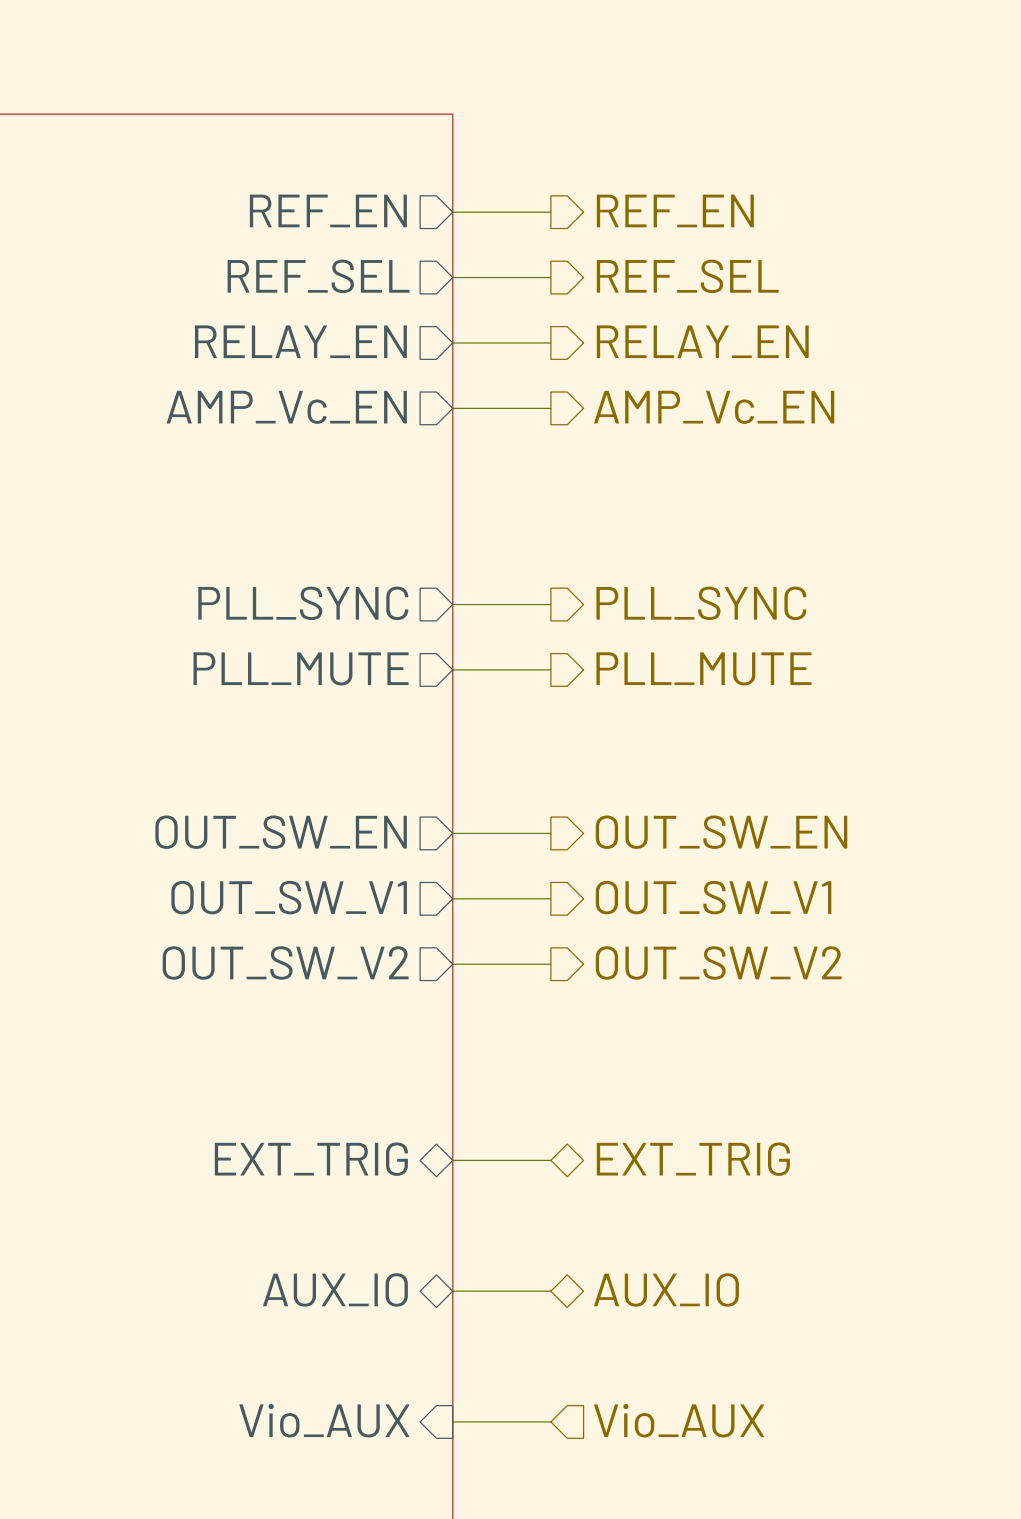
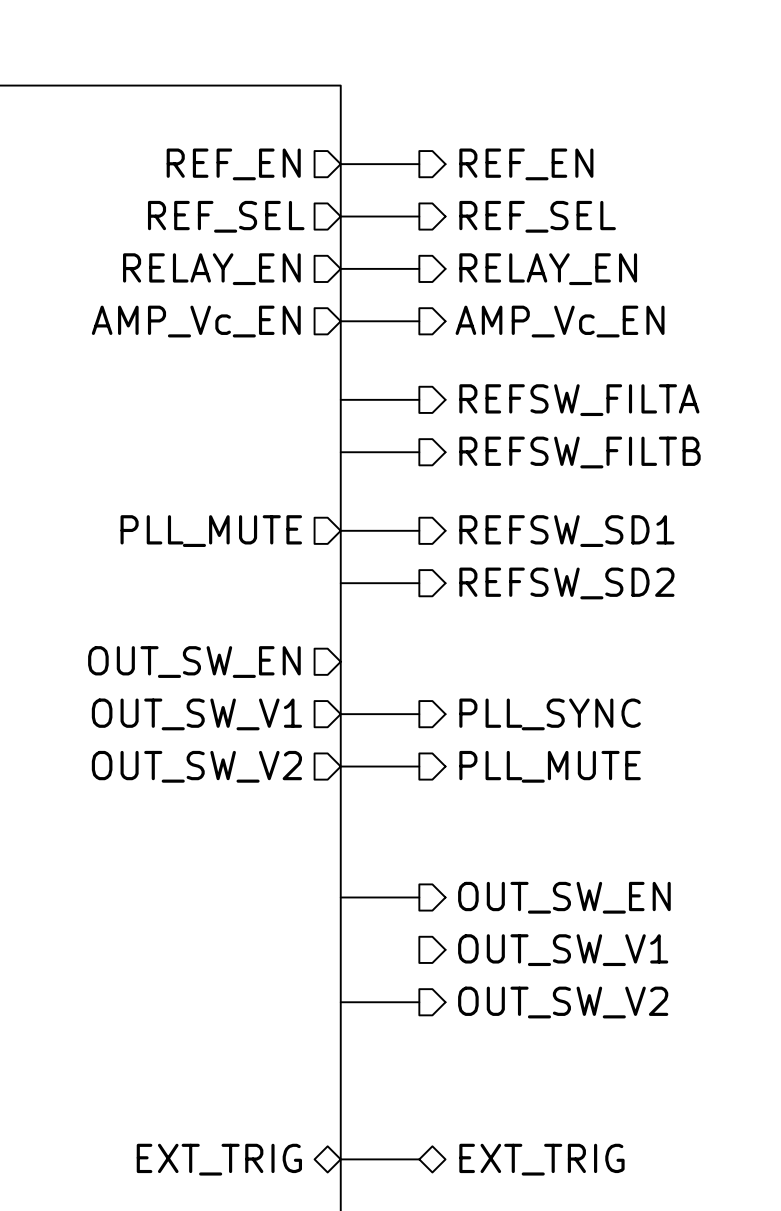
hierarchical label: none -> REFSW_FILTA (579, 400)
wire: none -> (340, 399) (419, 399)
hierarchical label: none -> REFSW_FILTB (580, 452)
sheet pin: PLL_SYNC (303, 603) -> none
hierarchical label: PLL_SYNC (701, 603) -> none
wire: (452, 604) (550, 604) -> (340, 452) (419, 452)
hierarchical label: PLL_MUTE (704, 668) -> REFSW_SD1 (566, 531)
hierarchical label: none -> REFSW_SD2 (566, 583)
hierarchical label position: OUT_SW_EN (721, 832) -> OUT_SW_EN (564, 897)
wire: (452, 833) (550, 833) -> (340, 583) (419, 583)
hierarchical label: OUT_SW_V1 (713, 897) -> PLL_SYNC (550, 714)
hierarchical label: OUT_SW_V2 (718, 962) -> PLL_MUTE (550, 766)
sheet pin position: EXT_TRIG (311, 1159) -> EXT_TRIG (219, 1159)
hierarchical label position: EXT_TRIG (693, 1159) -> EXT_TRIG (541, 1159)
wire: (452, 1160) (550, 1160) -> (340, 897) (419, 897)
hierarchical label: none -> OUT_SW_V1 (563, 950)
hierarchical label: none -> OUT_SW_V2 (563, 1002)
sheet pin: AUX_IO (335, 1289) -> none
hierarchical label: AUX_IO (666, 1289) -> none
wire: (452, 1291) (550, 1291) -> (340, 1002) (419, 1002)
sheet pin: Vio_AUX (324, 1420) -> none
hierarchical label: Vio_AUX (679, 1420) -> none
wire: (452, 1421) (550, 1421) -> (340, 1159) (419, 1159)

